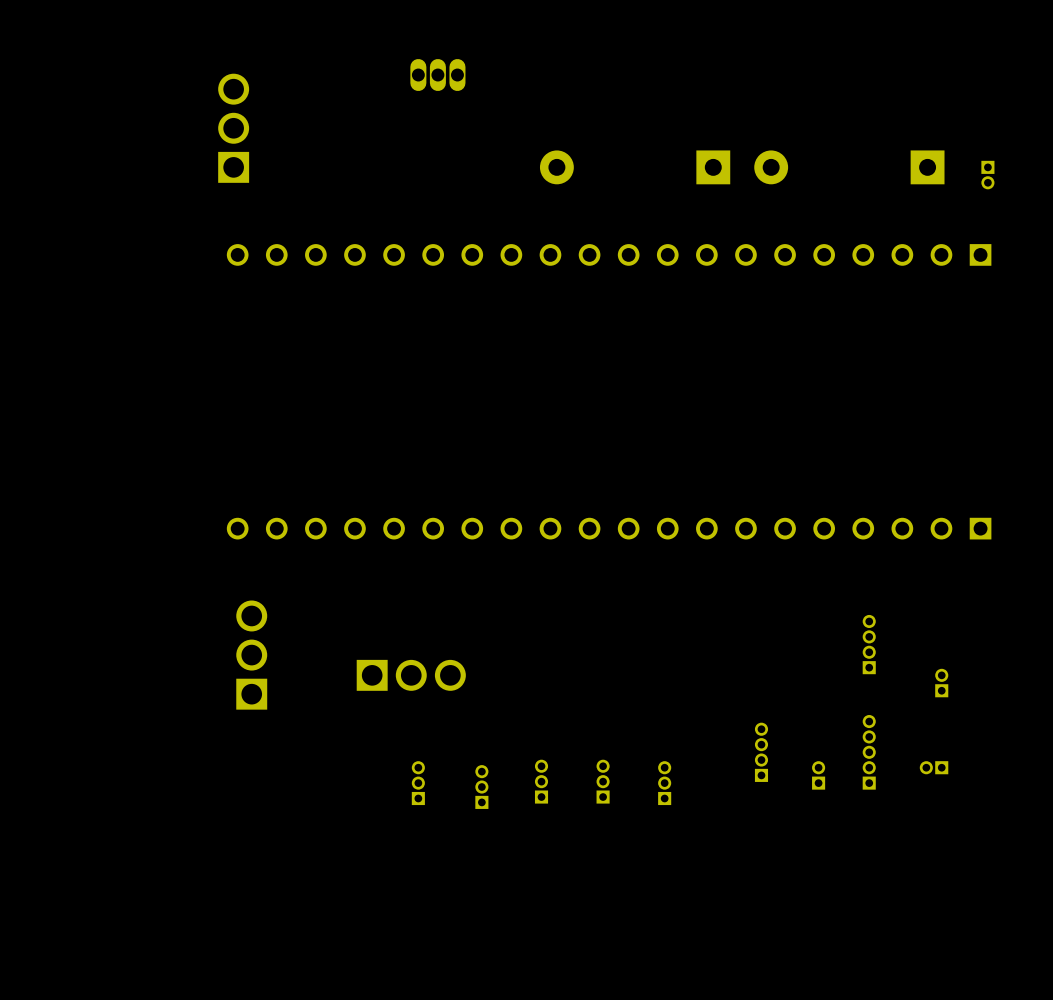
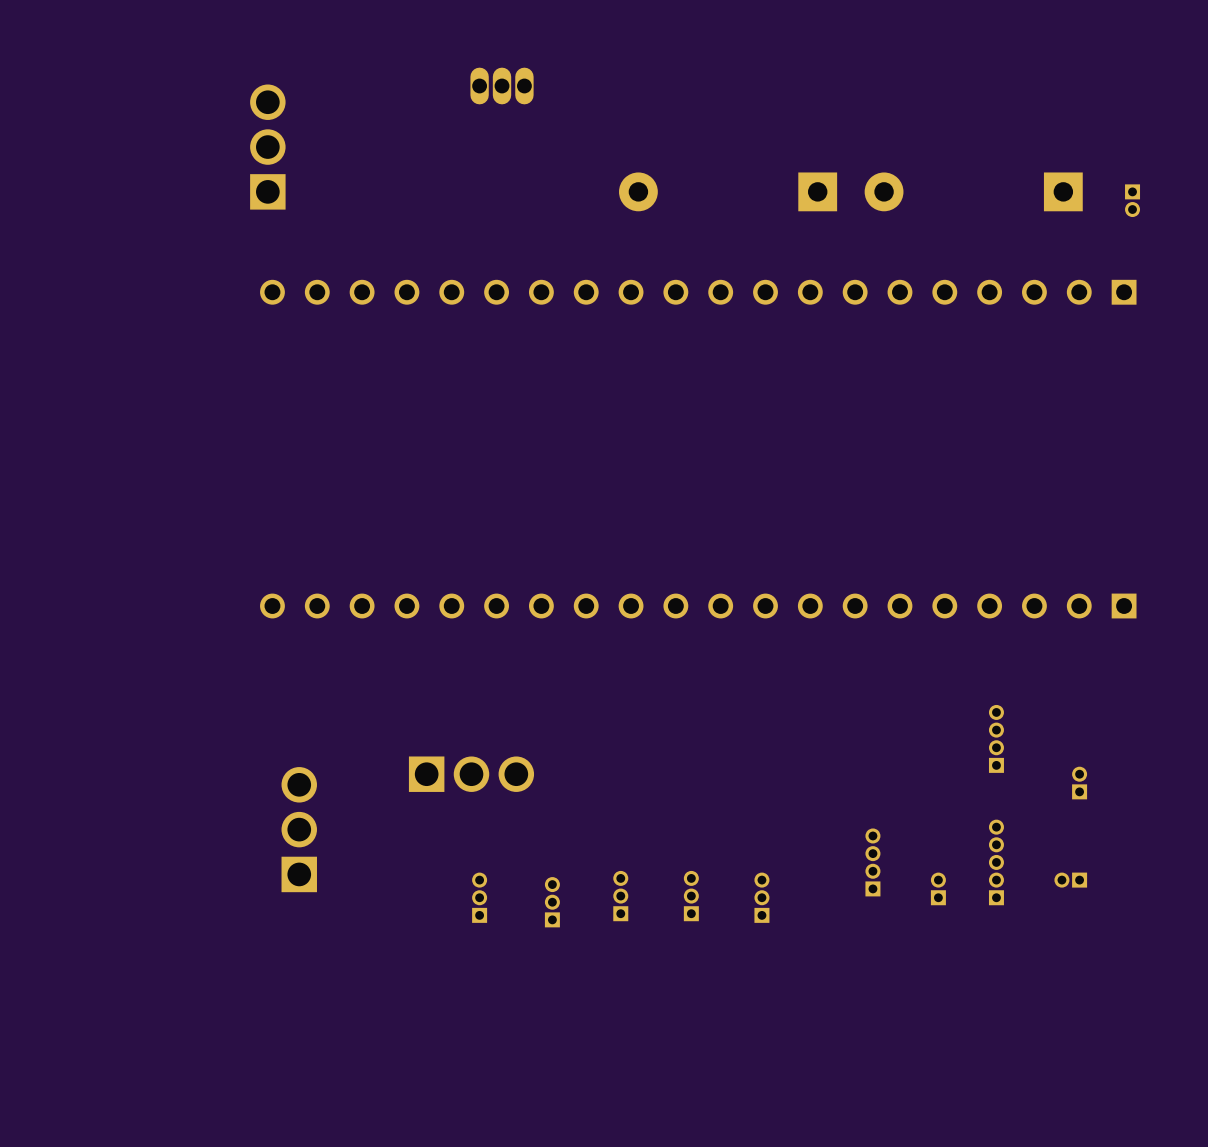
part position: (251, 655) -> (299, 829)

